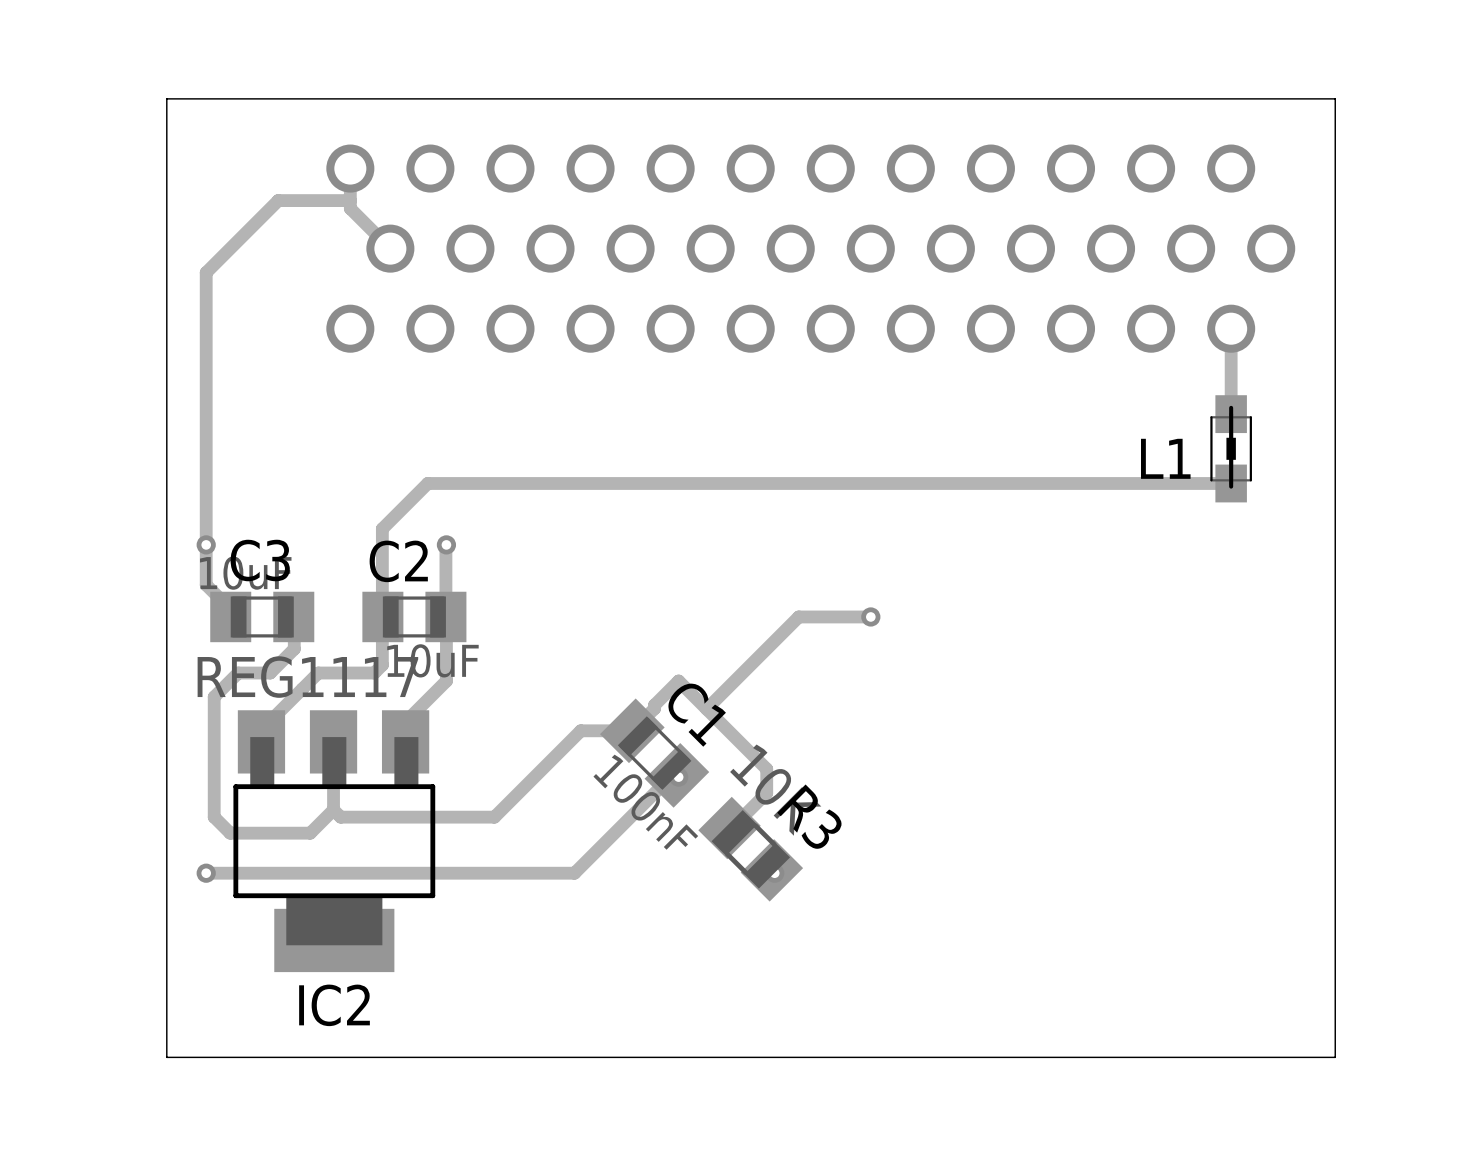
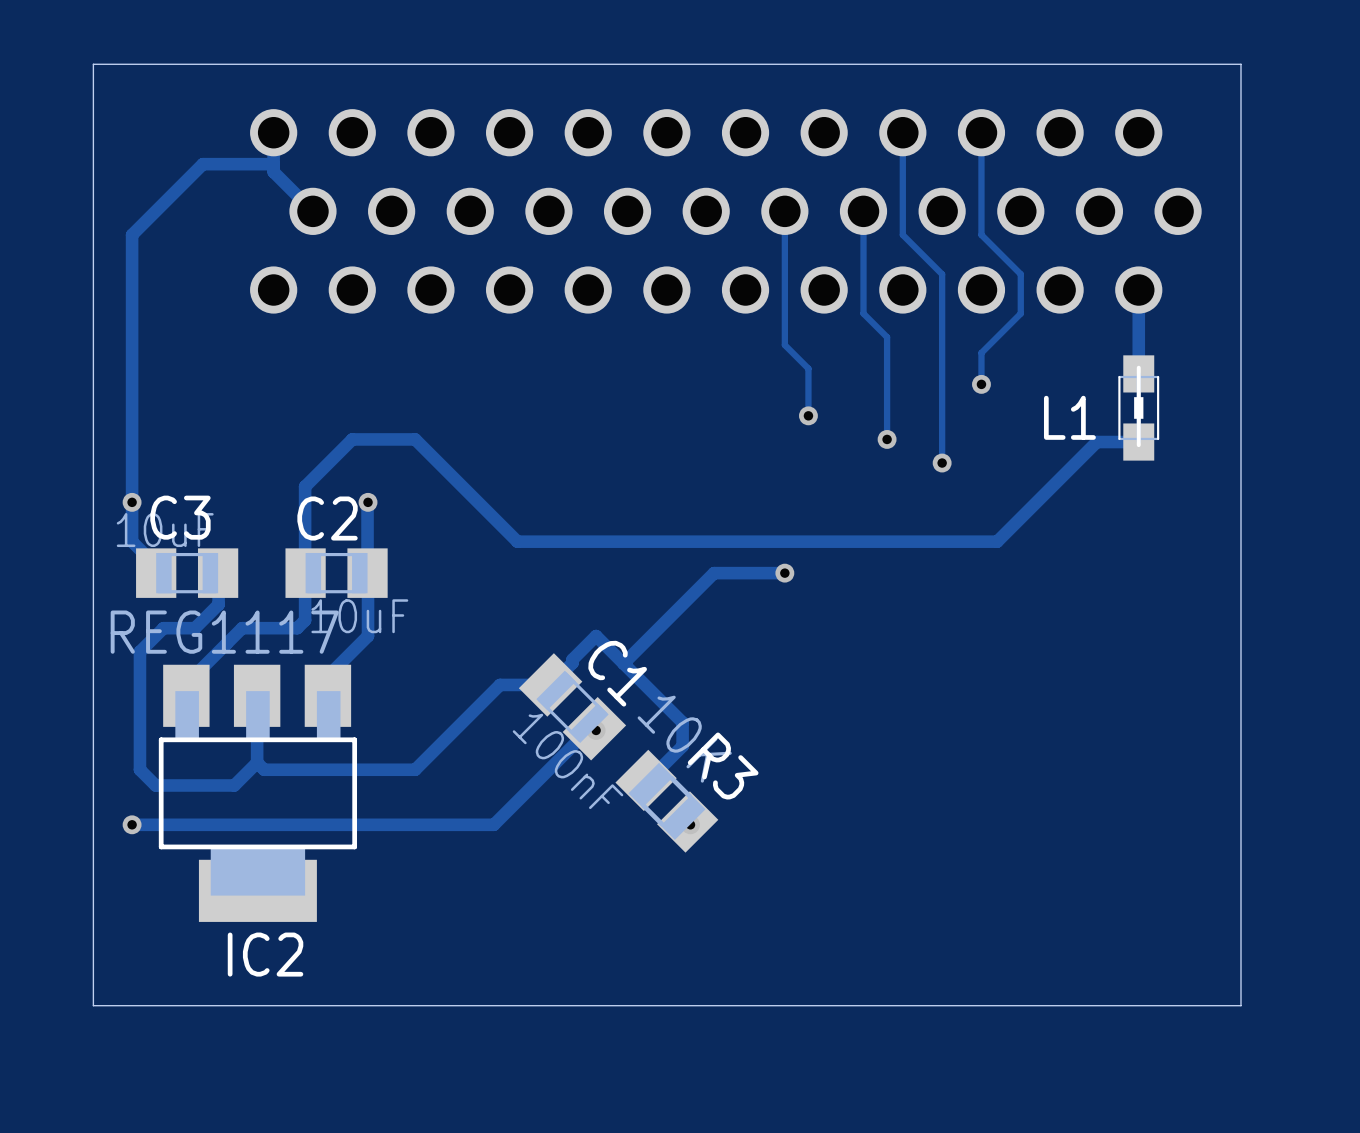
track: none -> (902, 132) (902, 234) (942, 274) (942, 463)
track: none -> (981, 132) (981, 234) (1020, 274) (1020, 313) (981, 352) (981, 384)
track: none -> (784, 211) (784, 345) (808, 368) (808, 415)
track: none -> (863, 211) (863, 313) (887, 337) (887, 439)
via: none -> (981, 384)
via: none -> (808, 415)
via: none -> (887, 439)
track: (1188, 483) (427, 483) -> (1096, 442) (997, 541) (517, 541) (415, 439) (352, 439) (349, 442)
via: none -> (942, 463)

